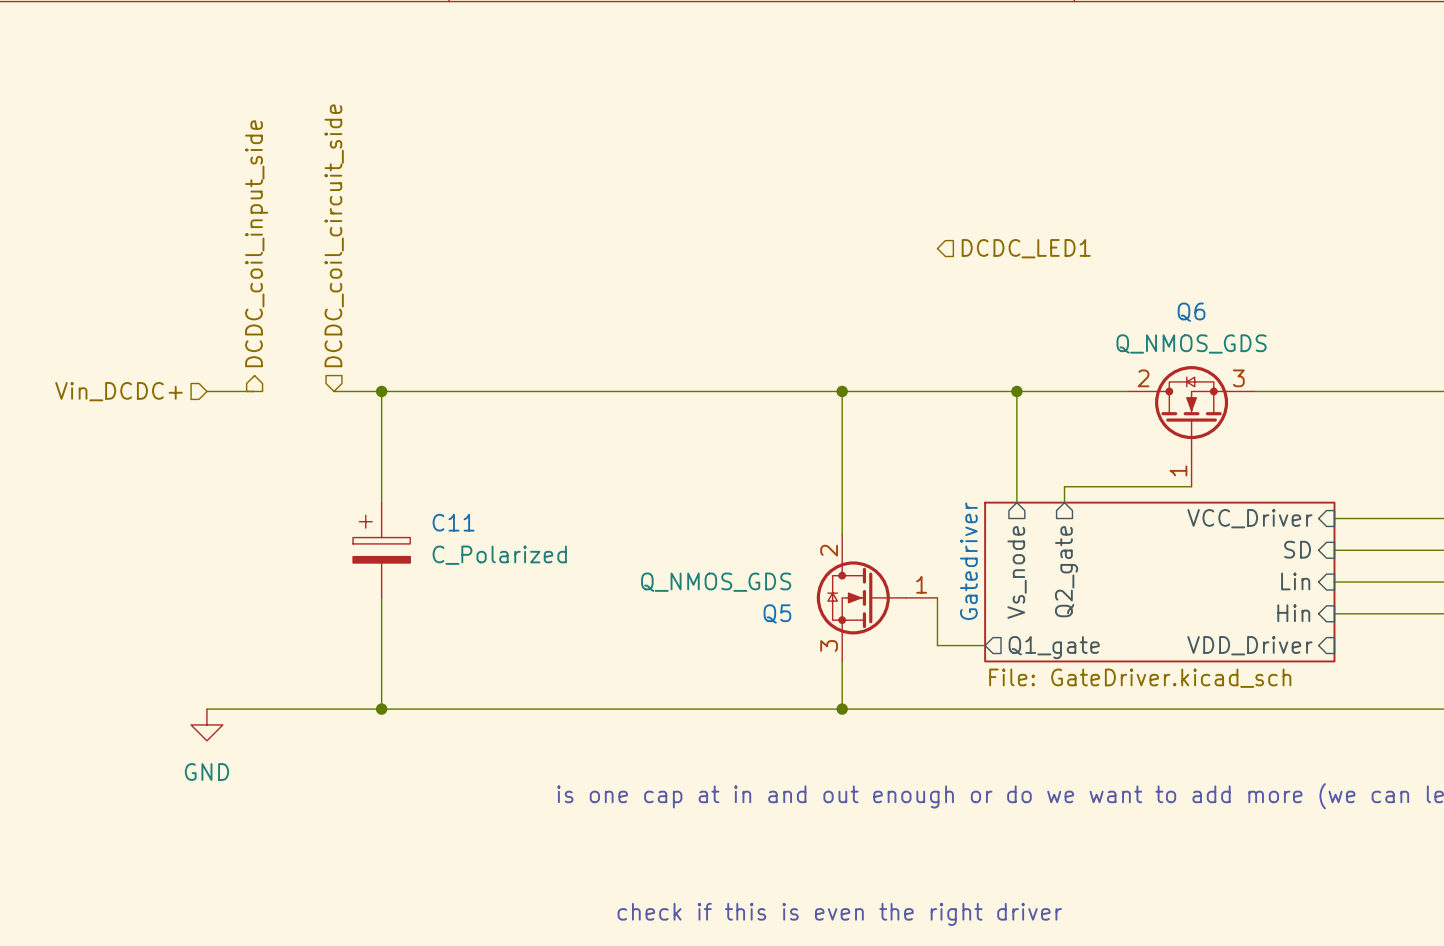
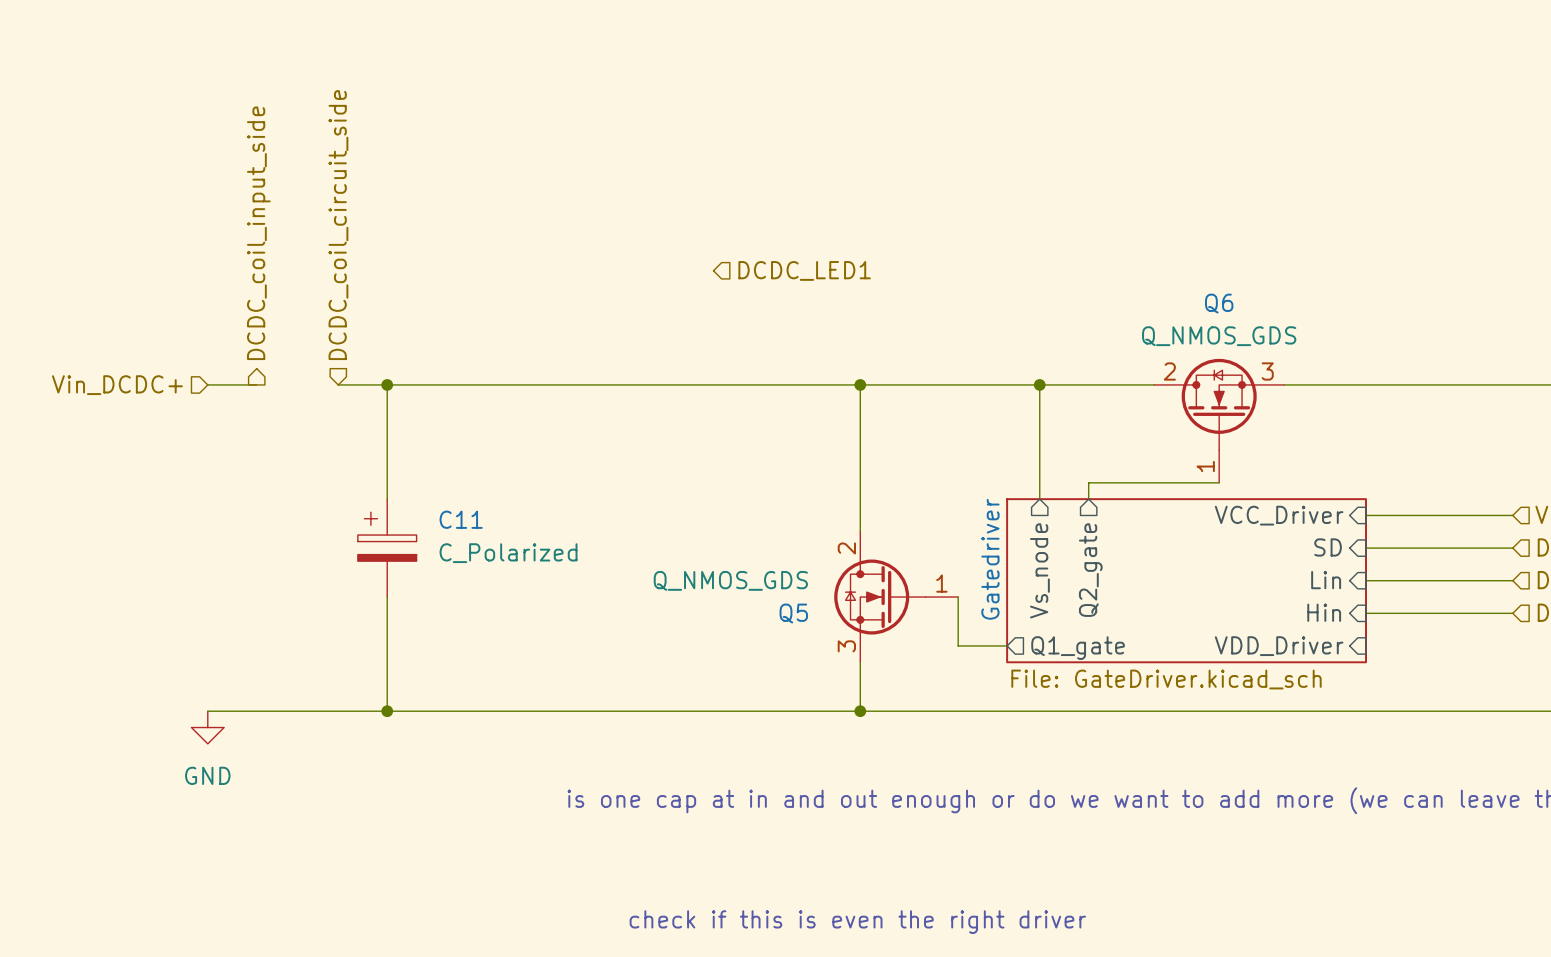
hierarchical label position: DCDC_LED1 (1026, 248) -> DCDC_LED1 (804, 270)

